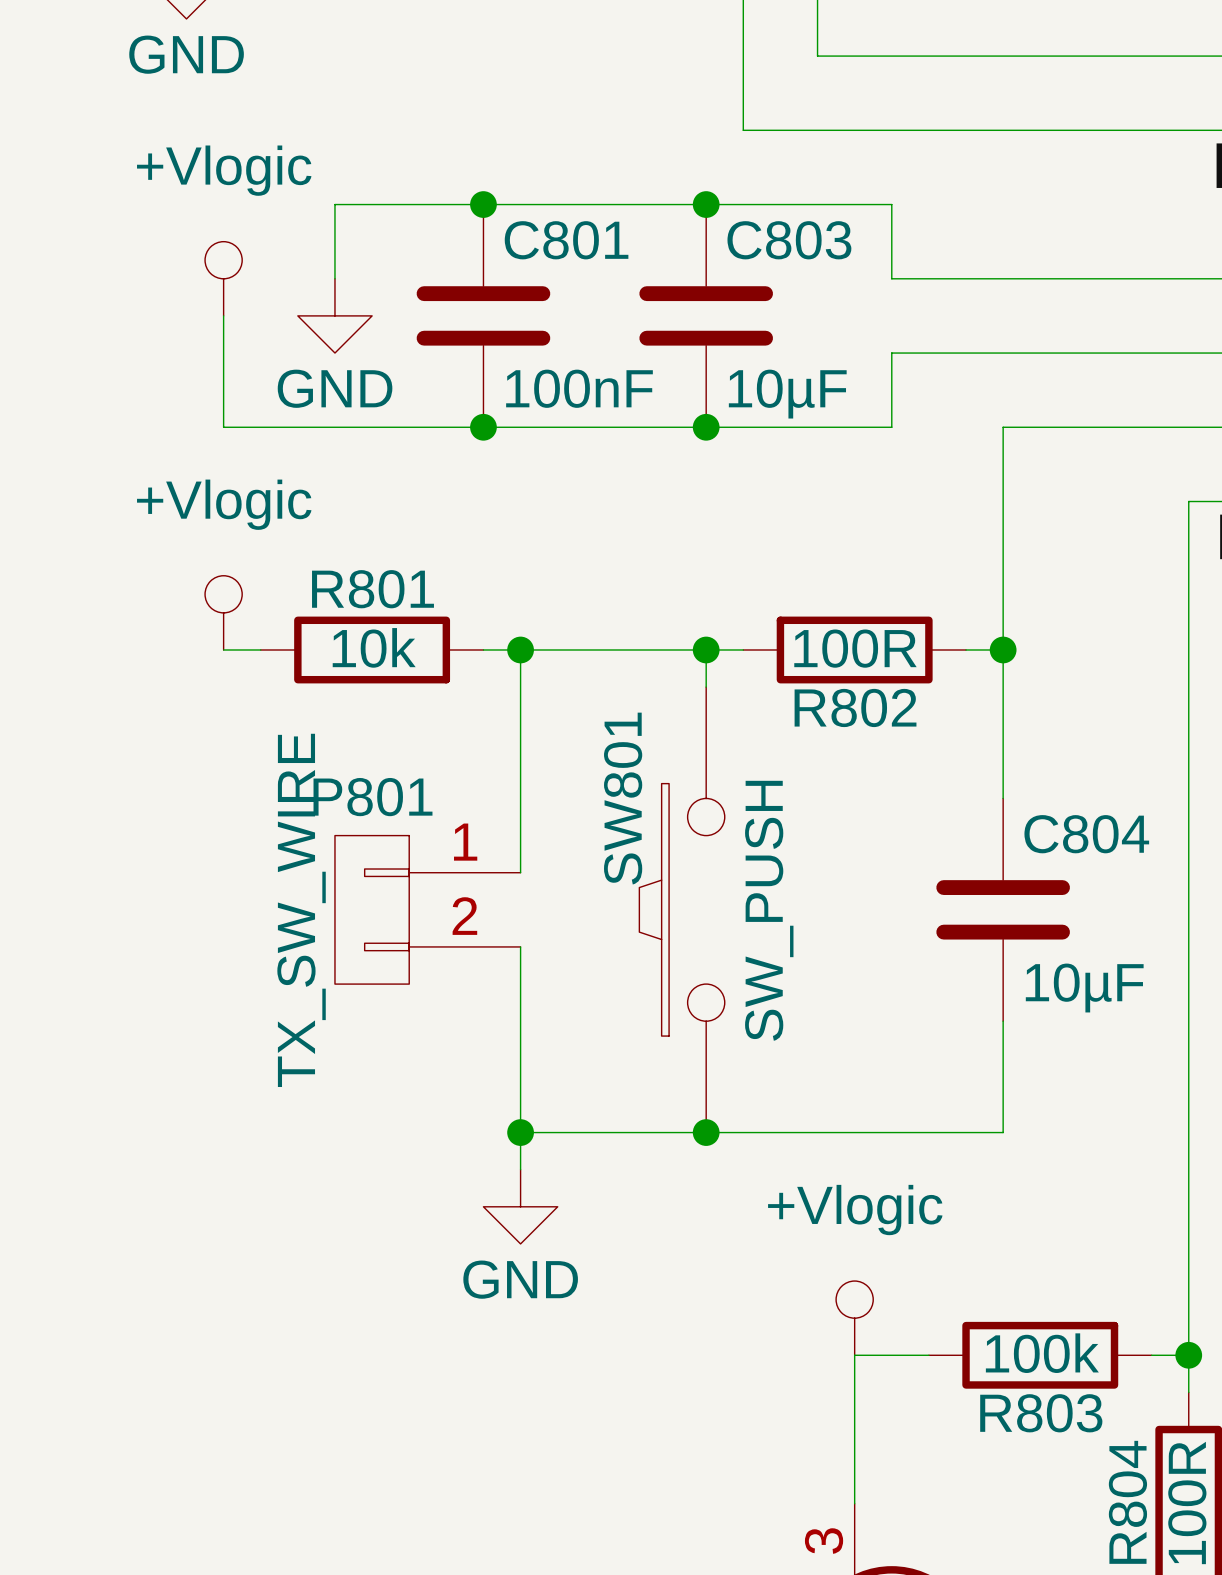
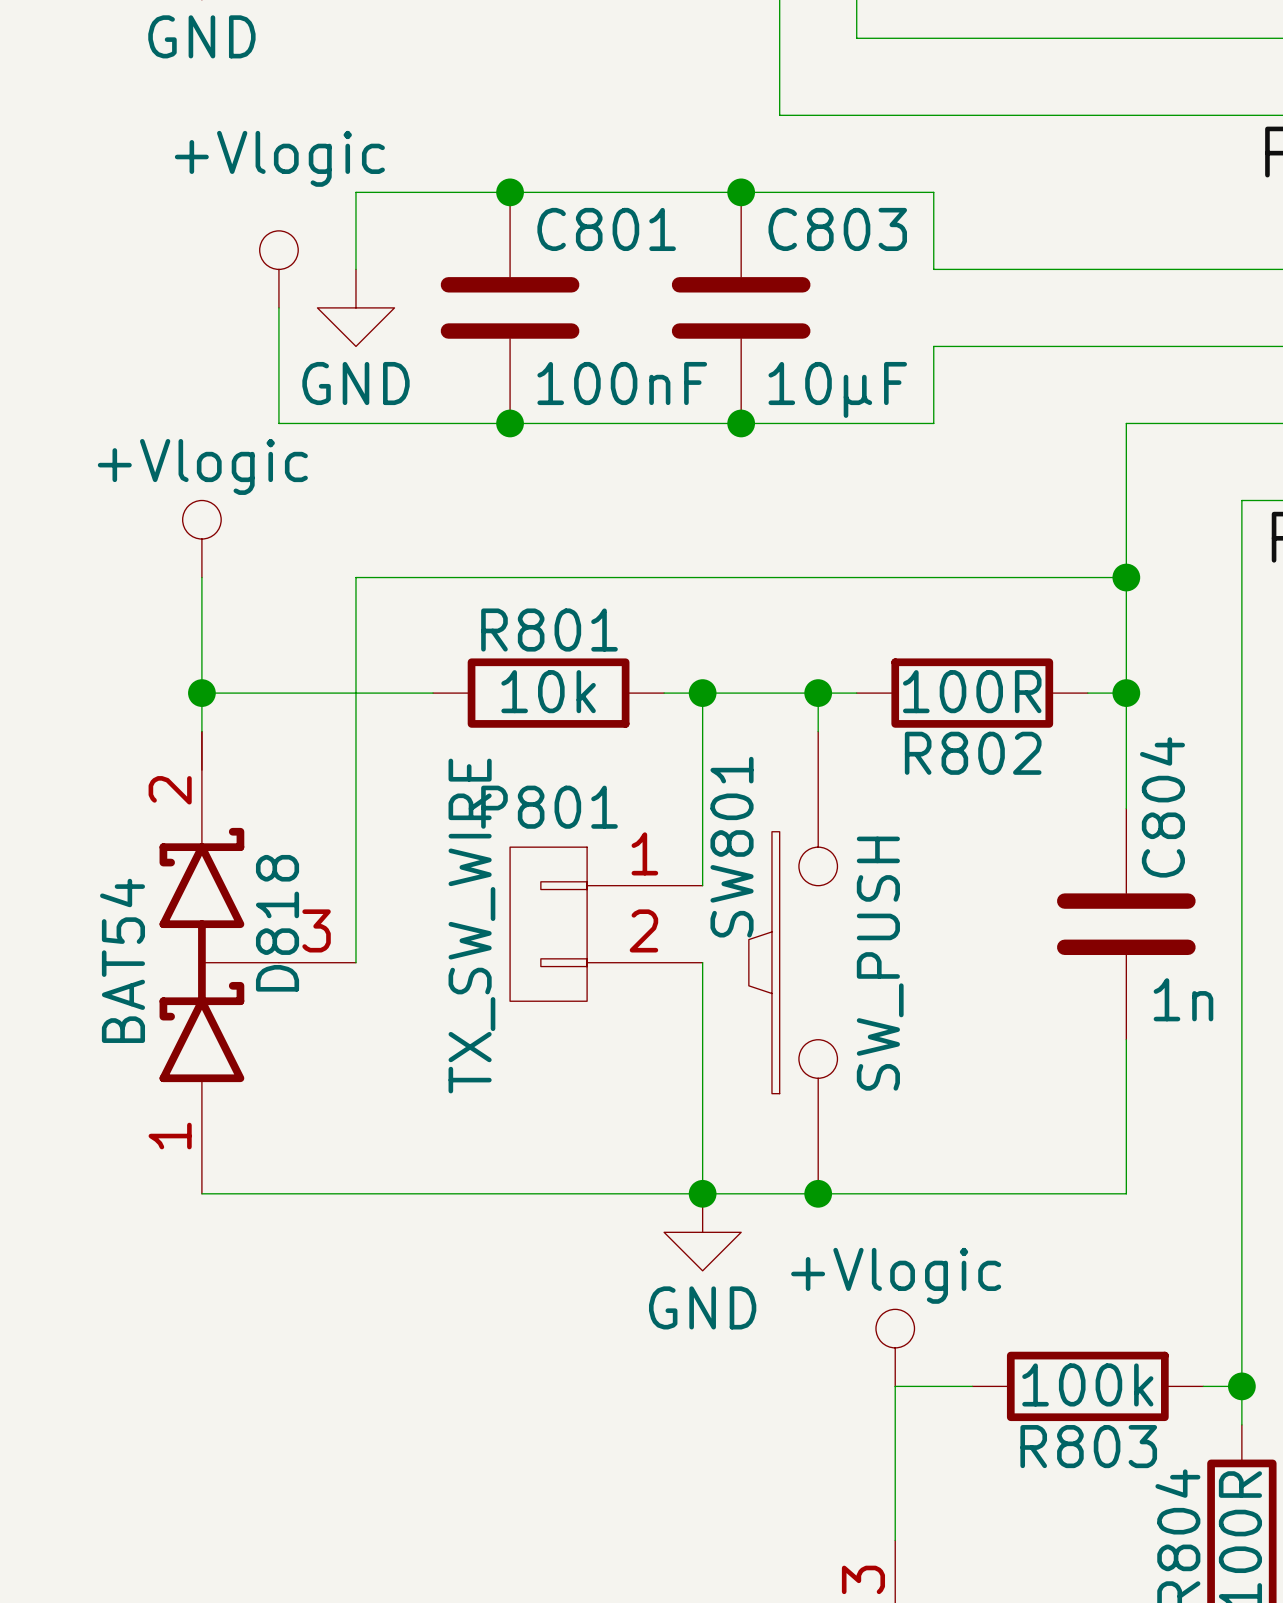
power symbol position: +Vlogic (223, 278) -> +Vlogic (278, 269)
wire: (223, 315) (223, 427) (260, 427) -> (278, 307) (278, 423)
wire: (1077, 427) (1003, 427) (1003, 798) -> (1126, 423) (1126, 808)
power symbol text position: +Vlogic (224, 504) -> +Vlogic (202, 466)
wire: none -> (201, 577) (201, 731)
wire: none -> (1126, 577) (355, 577) (355, 962)
junction: none -> (1126, 577)
power symbol position: +Vlogic (223, 612) -> +Vlogic (201, 539)
wire: (223, 649) (260, 649) -> none
R801 position: (372, 649) -> (548, 693)
wire: (483, 649) (743, 649) -> none
wire: (520, 649) (520, 872) -> none
junction: (520, 649) -> none
wire: (706, 649) (706, 687) -> (818, 693) (818, 731)
junction: (706, 649) -> none
R802 position: (854, 649) -> (972, 693)
wire: (966, 649) (1003, 649) -> (1087, 693) (1126, 693)
junction: (1003, 649) -> none
wire: none -> (201, 693) (433, 693)
junction: none -> (201, 693)
wire: none -> (664, 693) (856, 693)
wire: none -> (702, 693) (702, 885)
junction: none -> (702, 693)
junction: none -> (818, 693)
junction: none -> (1126, 693)
C804 name rotation: 0° (1086, 834) -> 90° counterclockwise (1162, 807)
P801 position: (427, 909) -> (606, 924)
SW801 position: (682, 909) -> (793, 962)
C804 position: (1003, 909) -> (1126, 924)
D818: none -> BAT54 (257, 962)
wire: (520, 946) (520, 1169) -> (702, 962) (702, 1193)
C804 value: 10µF (1084, 988) -> 1n (1183, 999)
wire: (1003, 1021) (1003, 1132) (520, 1132) -> none
wire: none -> (1126, 1039) (1126, 1193) (201, 1193)
junction: (520, 1132) -> none
junction: (706, 1132) -> none
junction: none -> (702, 1193)
junction: none -> (818, 1193)
power symbol position: GND (520, 1206) -> GND (702, 1232)
power symbol text position: +Vlogic (855, 1210) -> +Vlogic (896, 1275)

